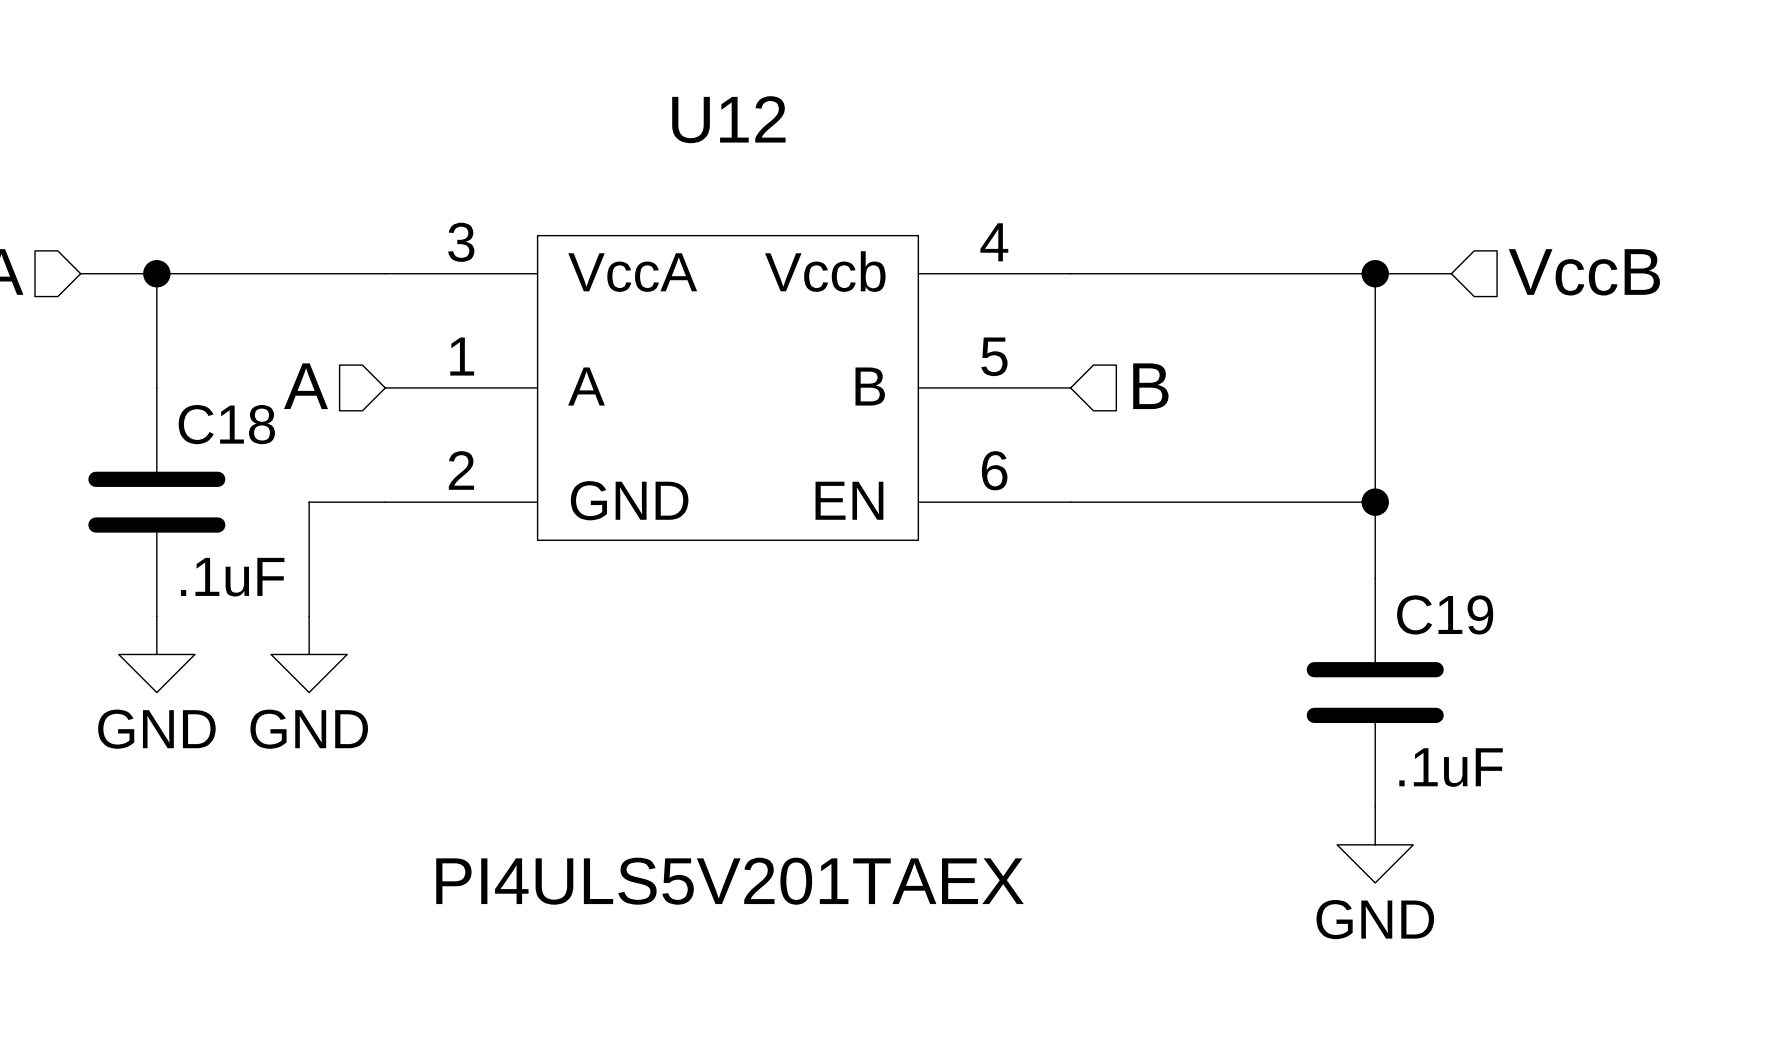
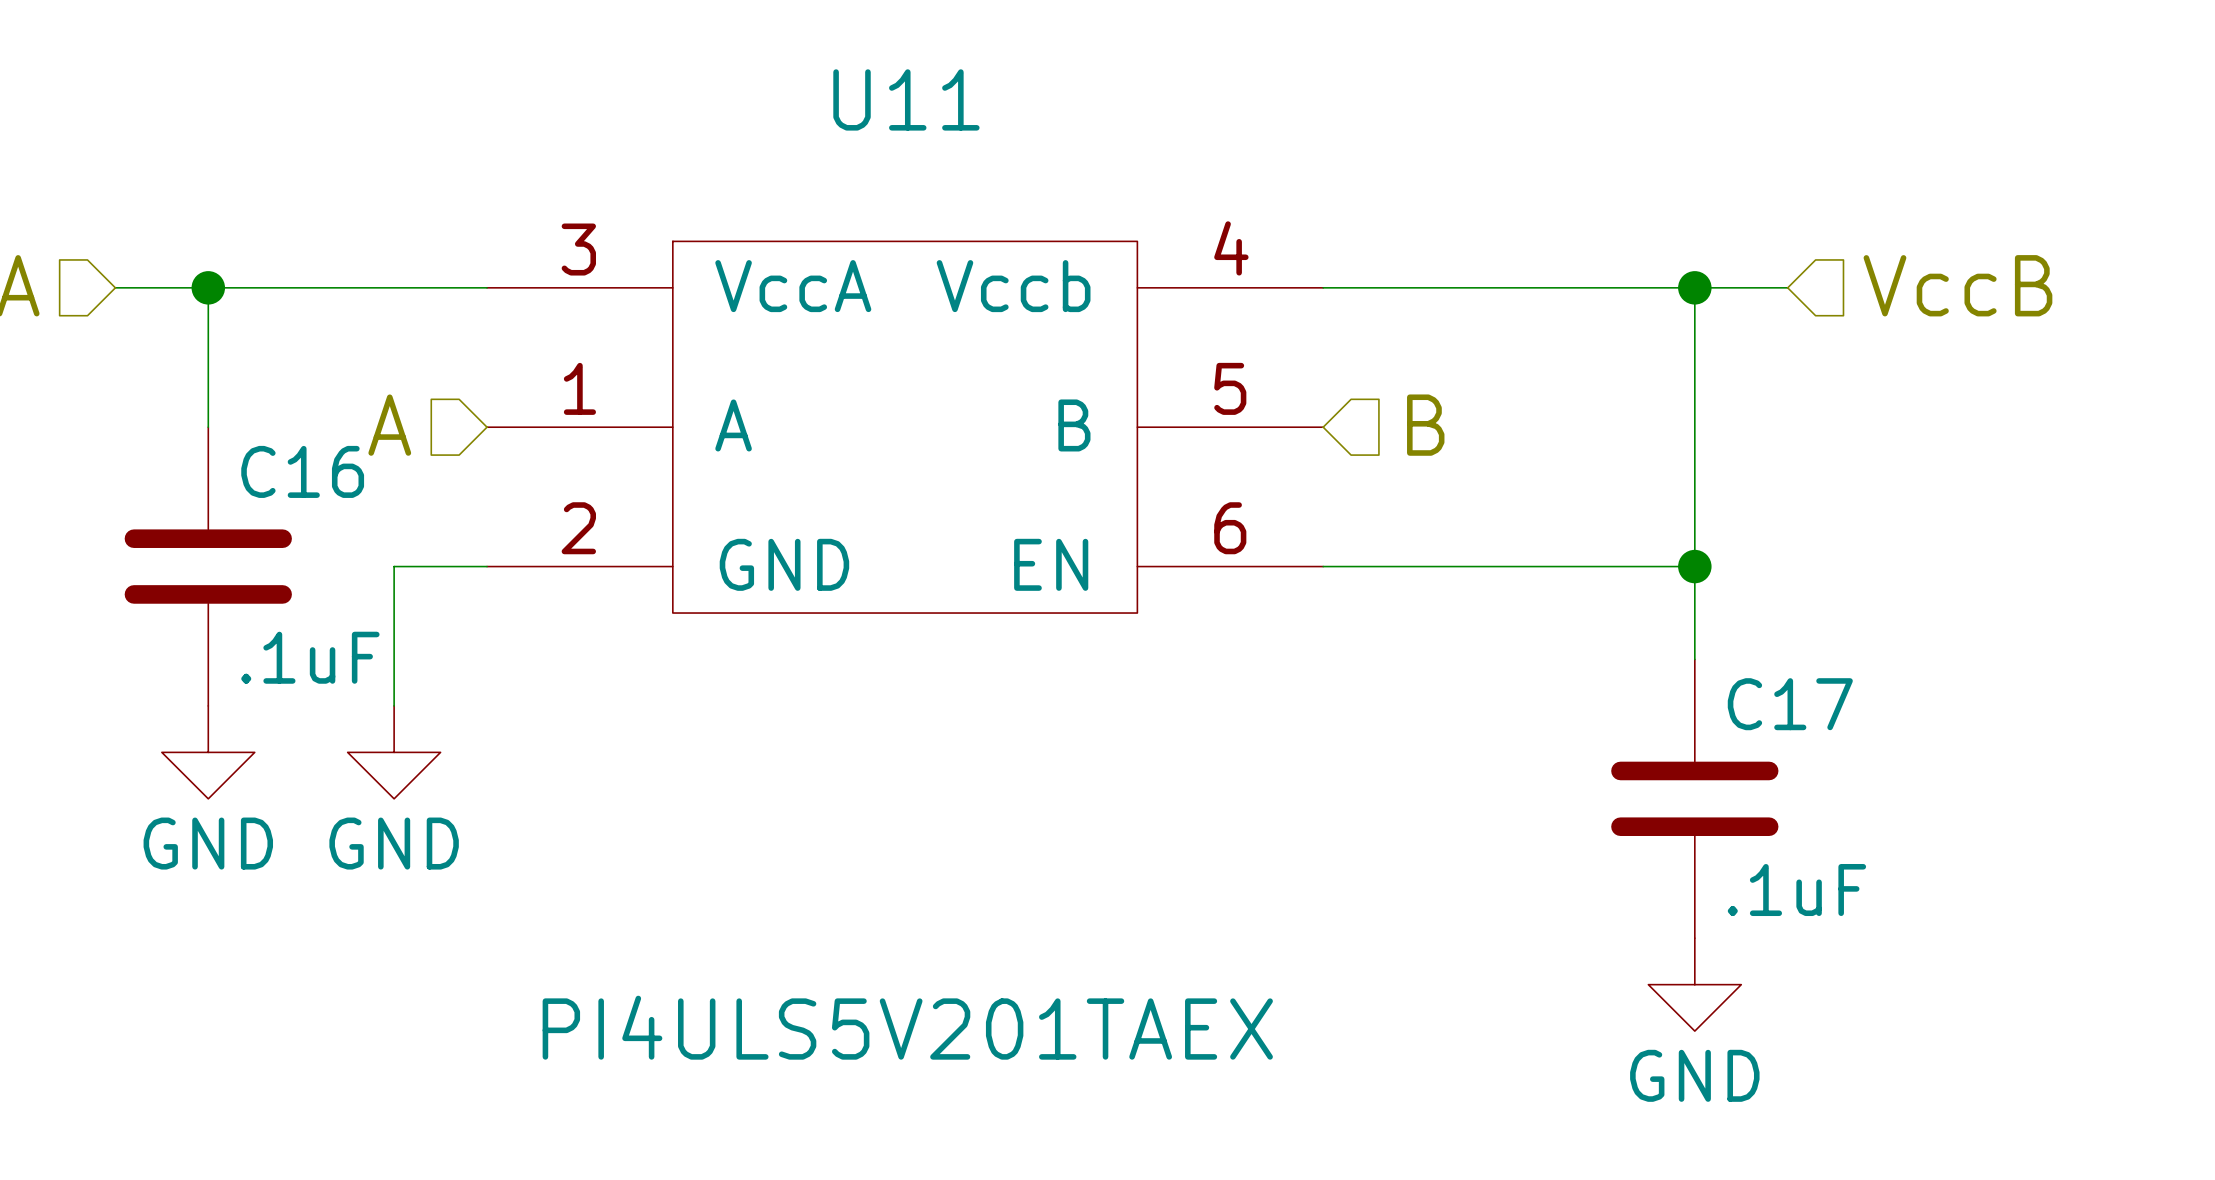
U12 name: U12 (728, 119) -> U11 (906, 99)
C18 name: C18 (226, 424) -> C16 (302, 471)
C19 name: C19 (1445, 614) -> C17 (1790, 704)

